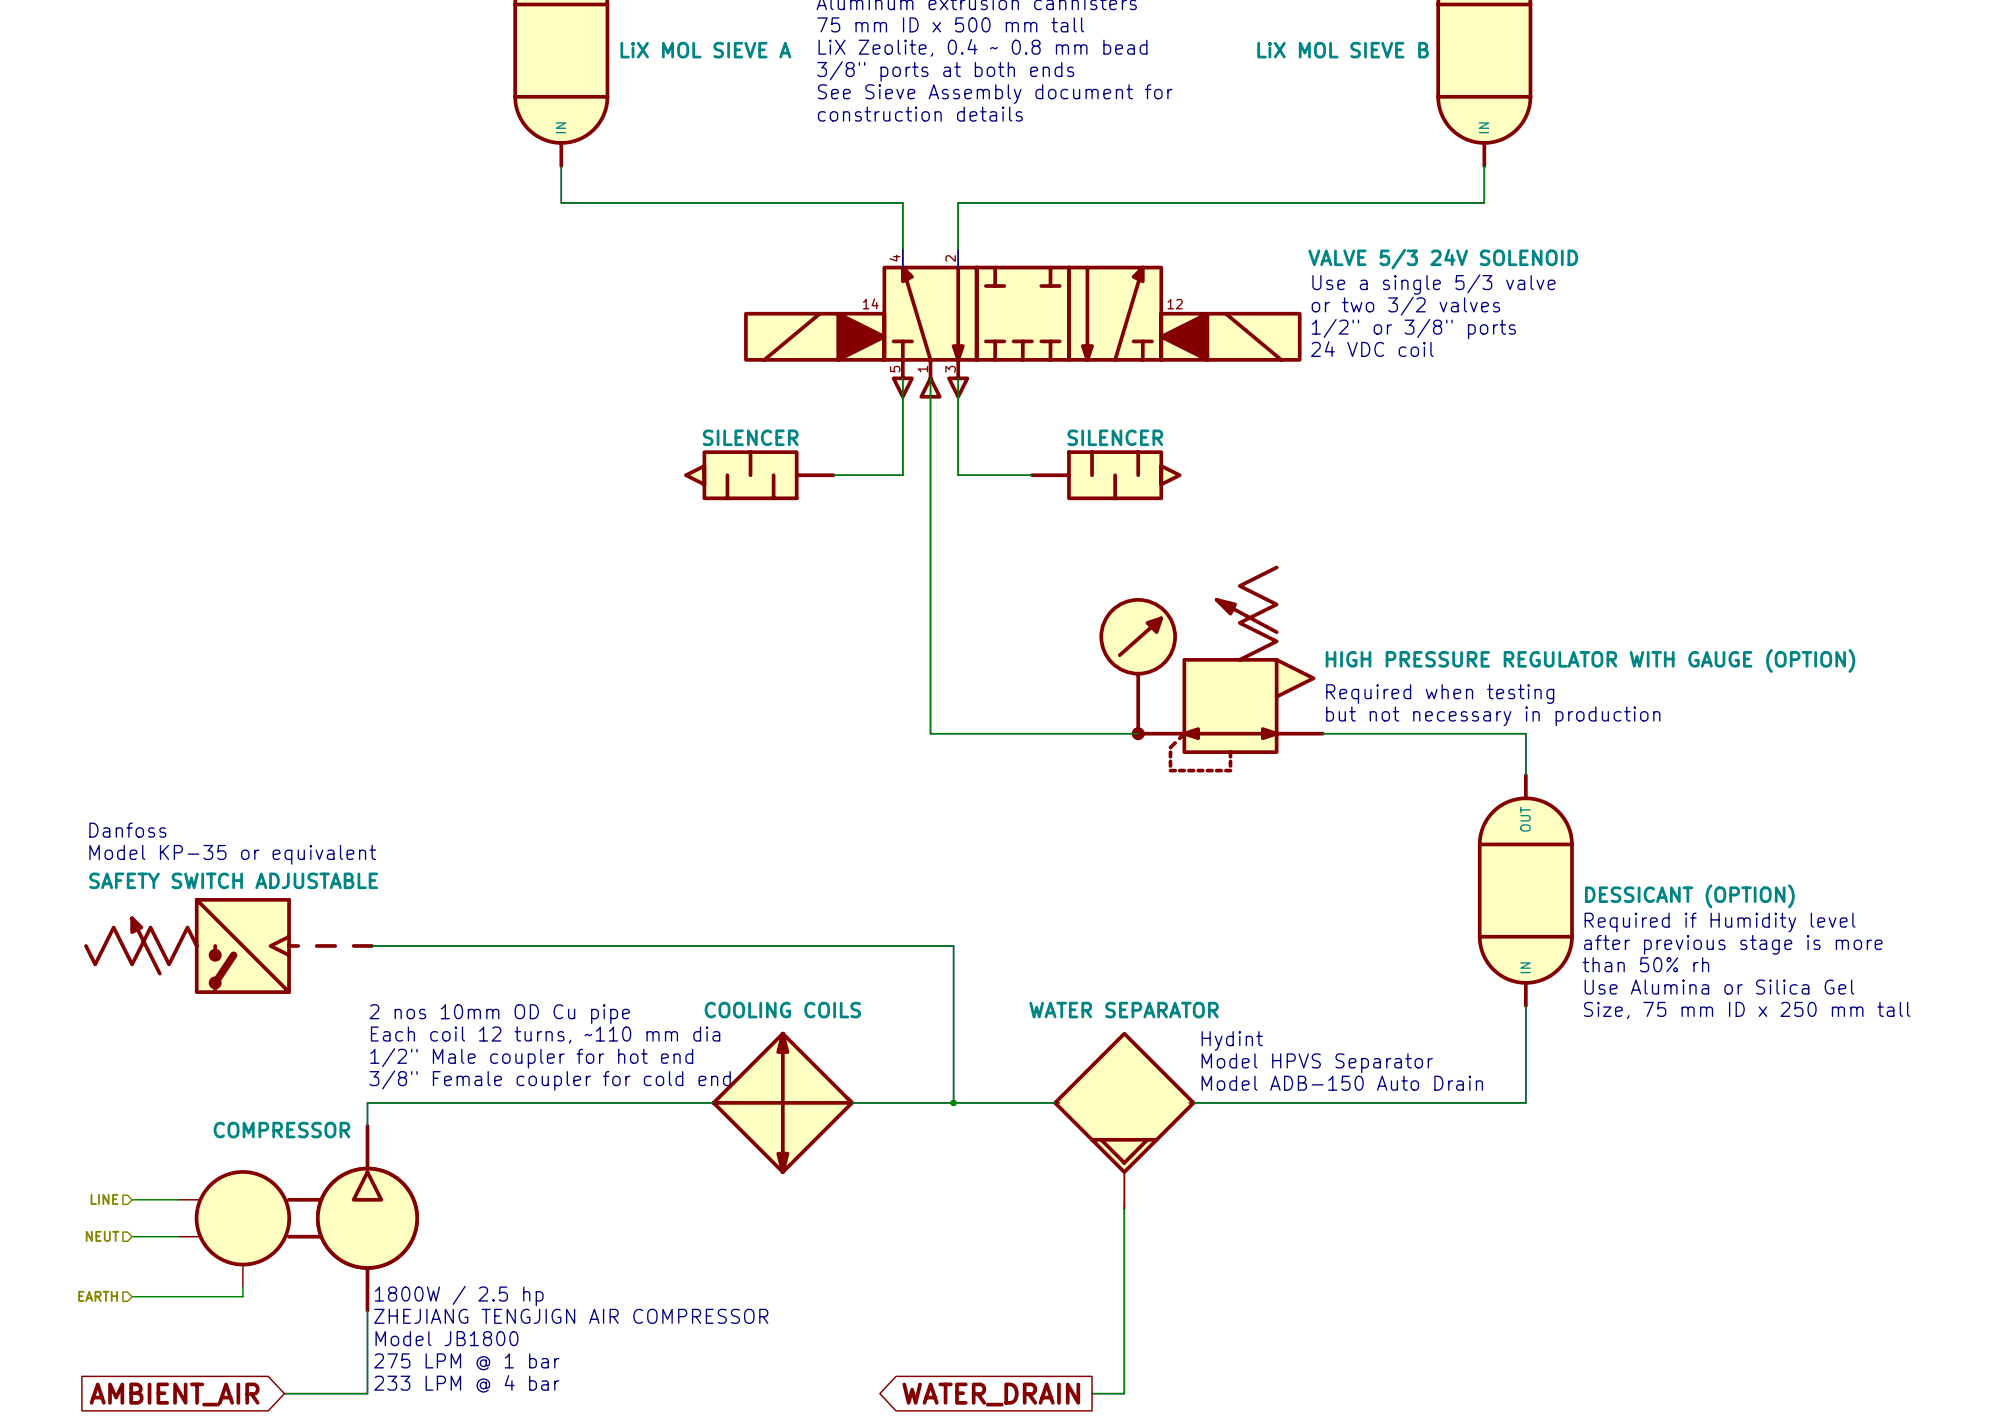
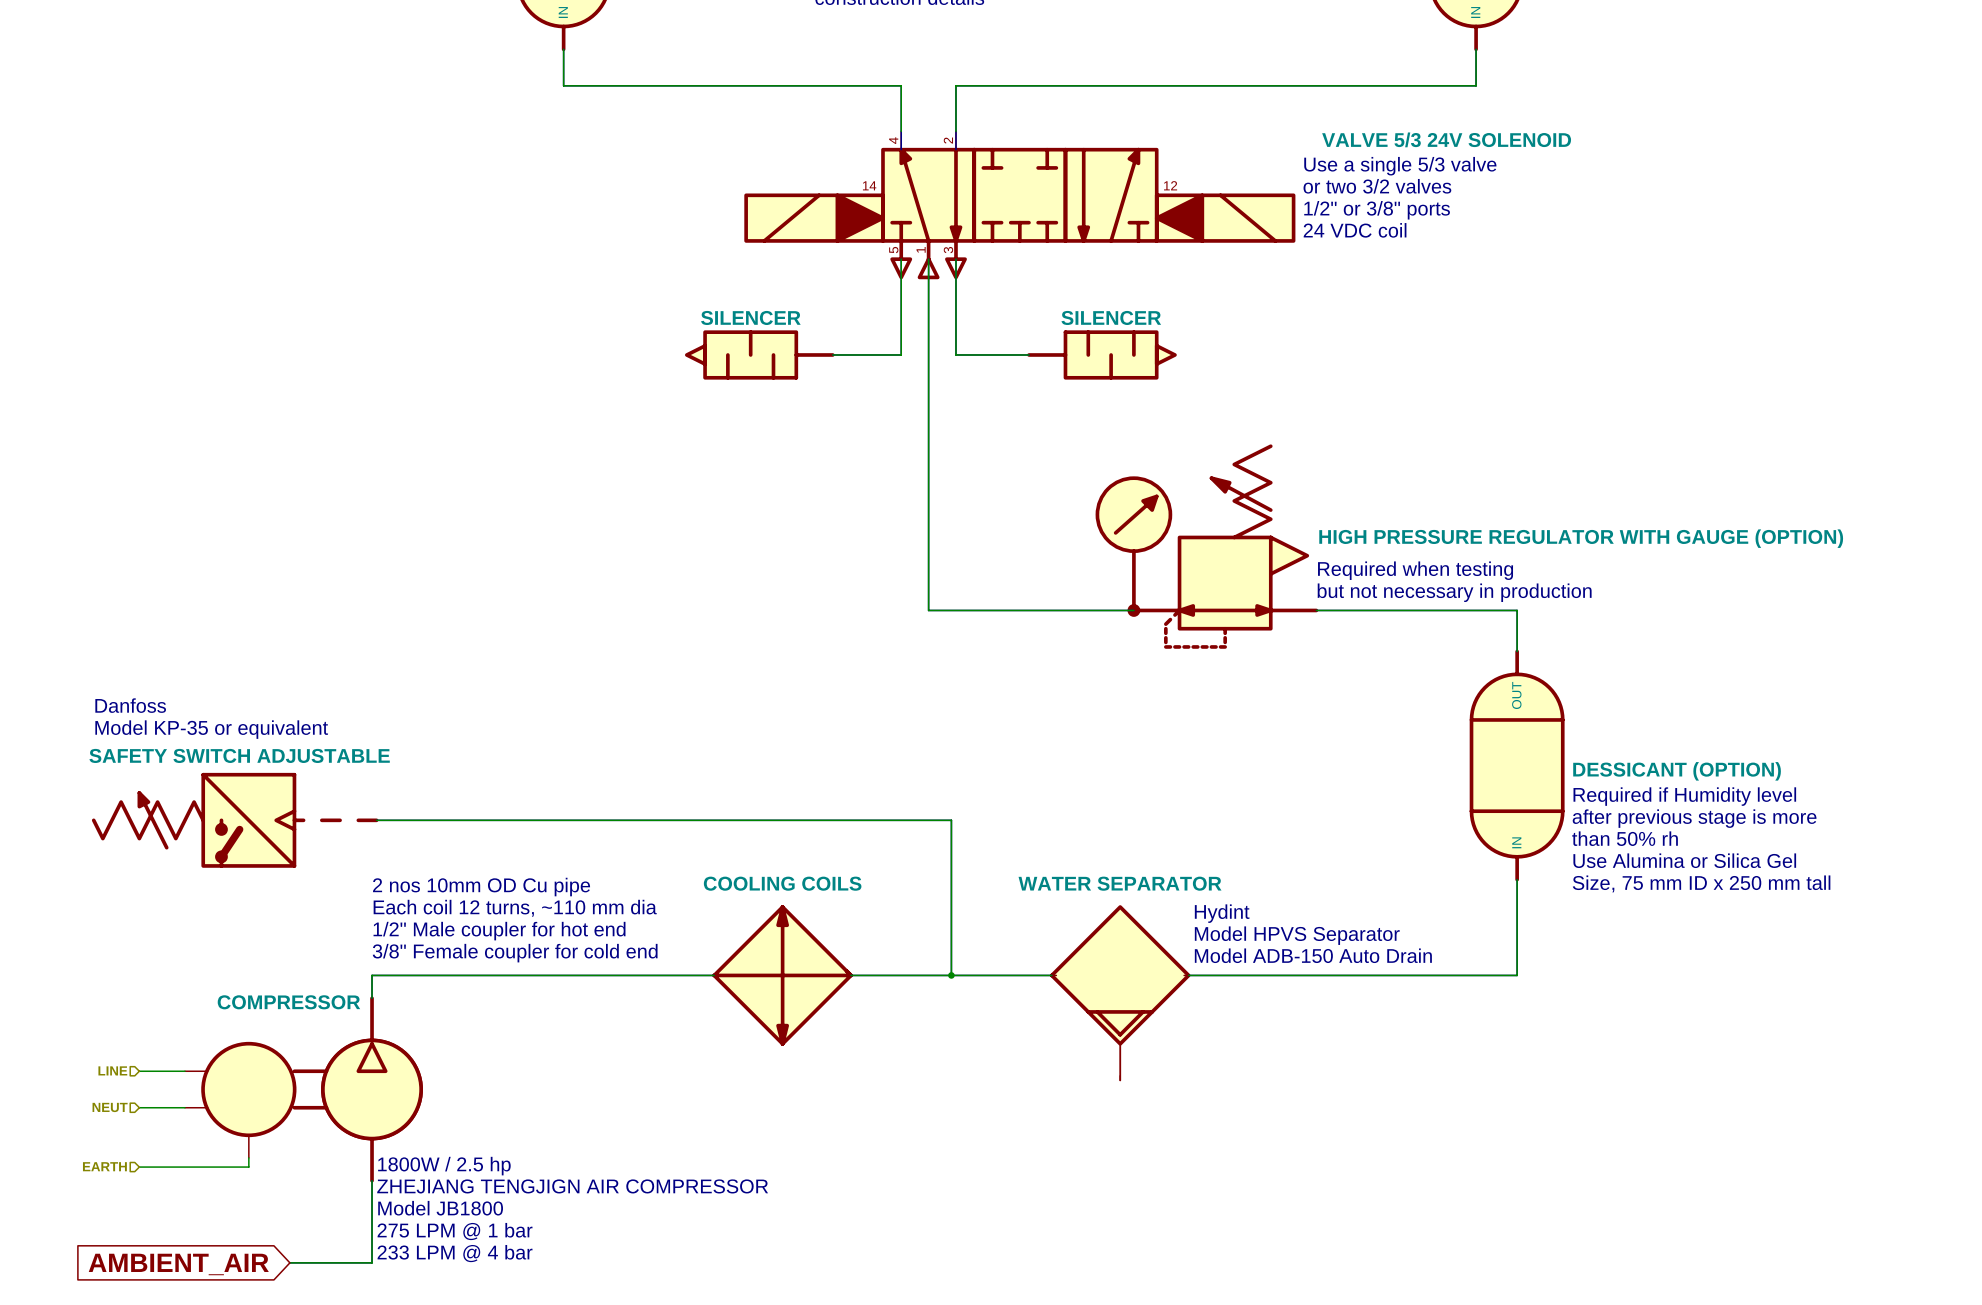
wire: (1124, 1209) (1124, 1393) (1092, 1393) -> none
global label: WATER_DRAIN (991, 1394) -> none

